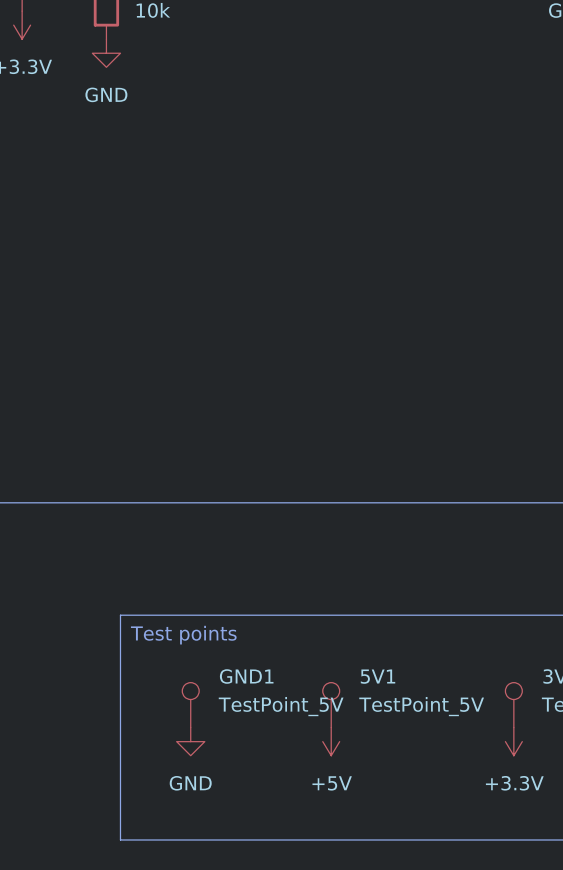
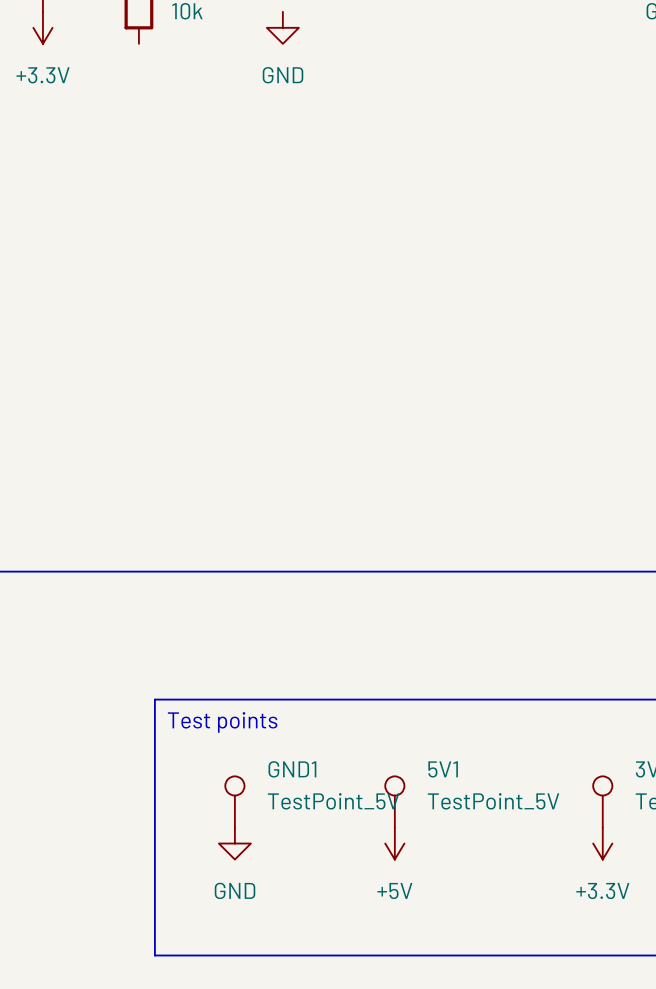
power symbol: none -> GND (282, 27)
power symbol: GND (106, 53) -> none

